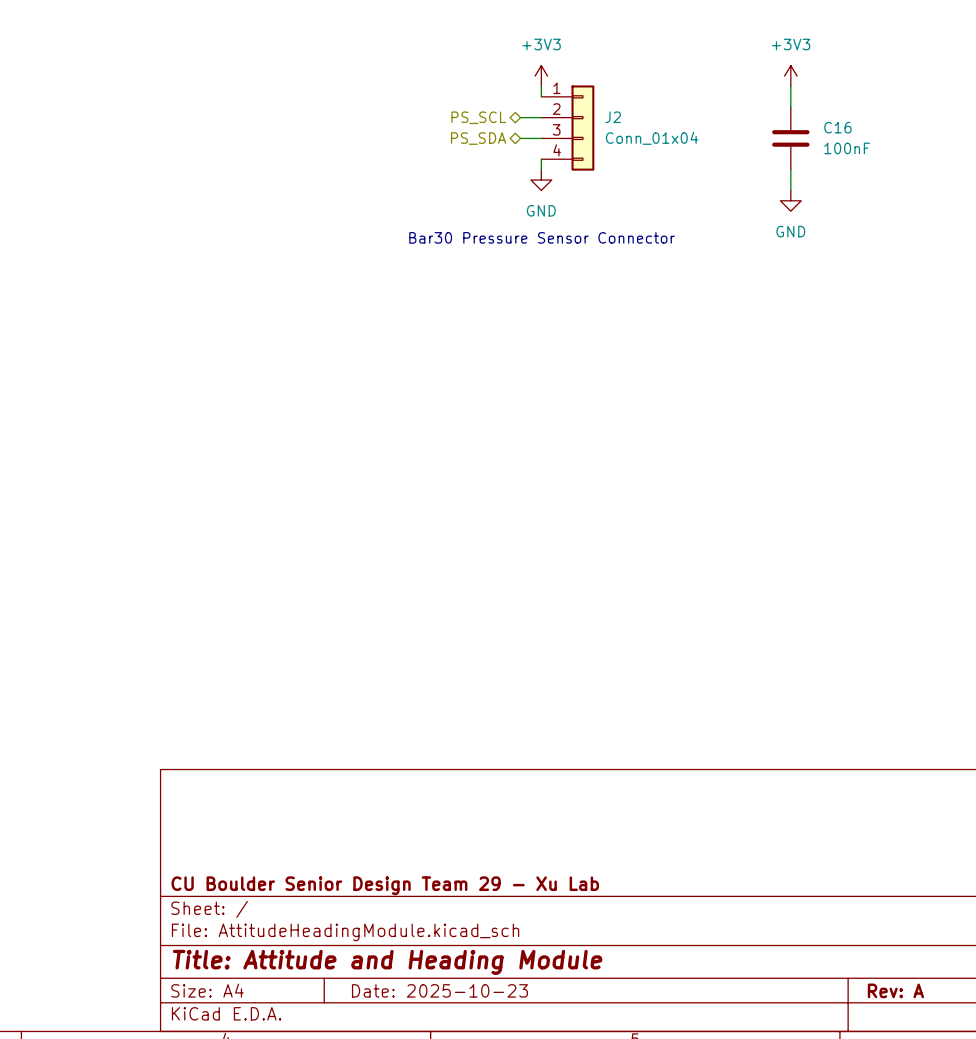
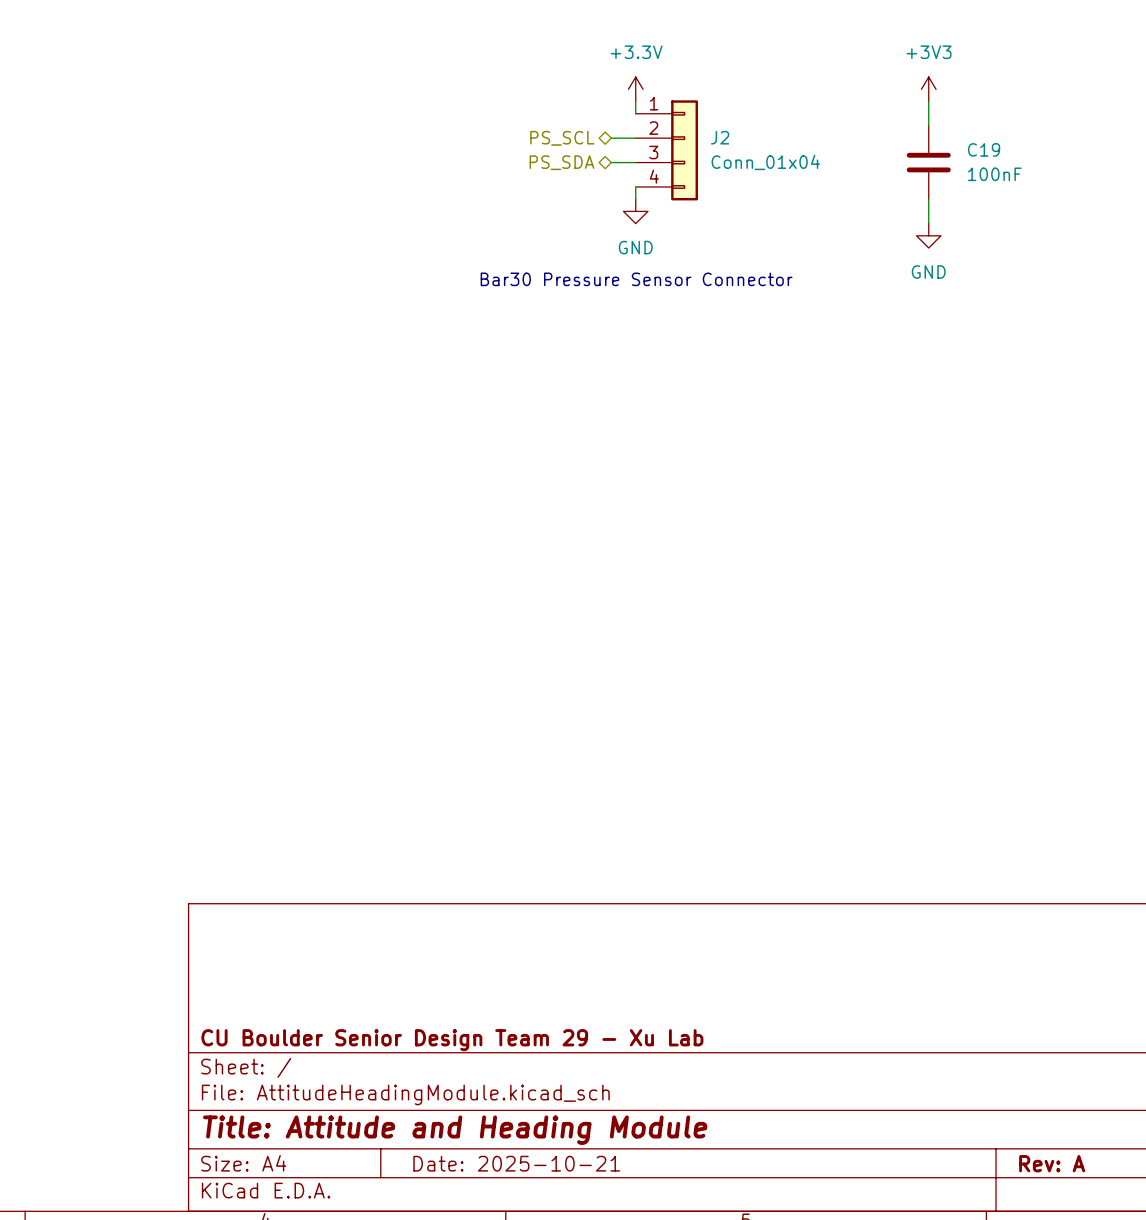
power symbol: +3V3 (541, 76) -> +3.3V (635, 89)
C16 name: C16 (837, 127) -> C19 (984, 149)
title block: Date: 2025-10-23 (439, 990) -> Date: 2025-10-21 (516, 1163)

